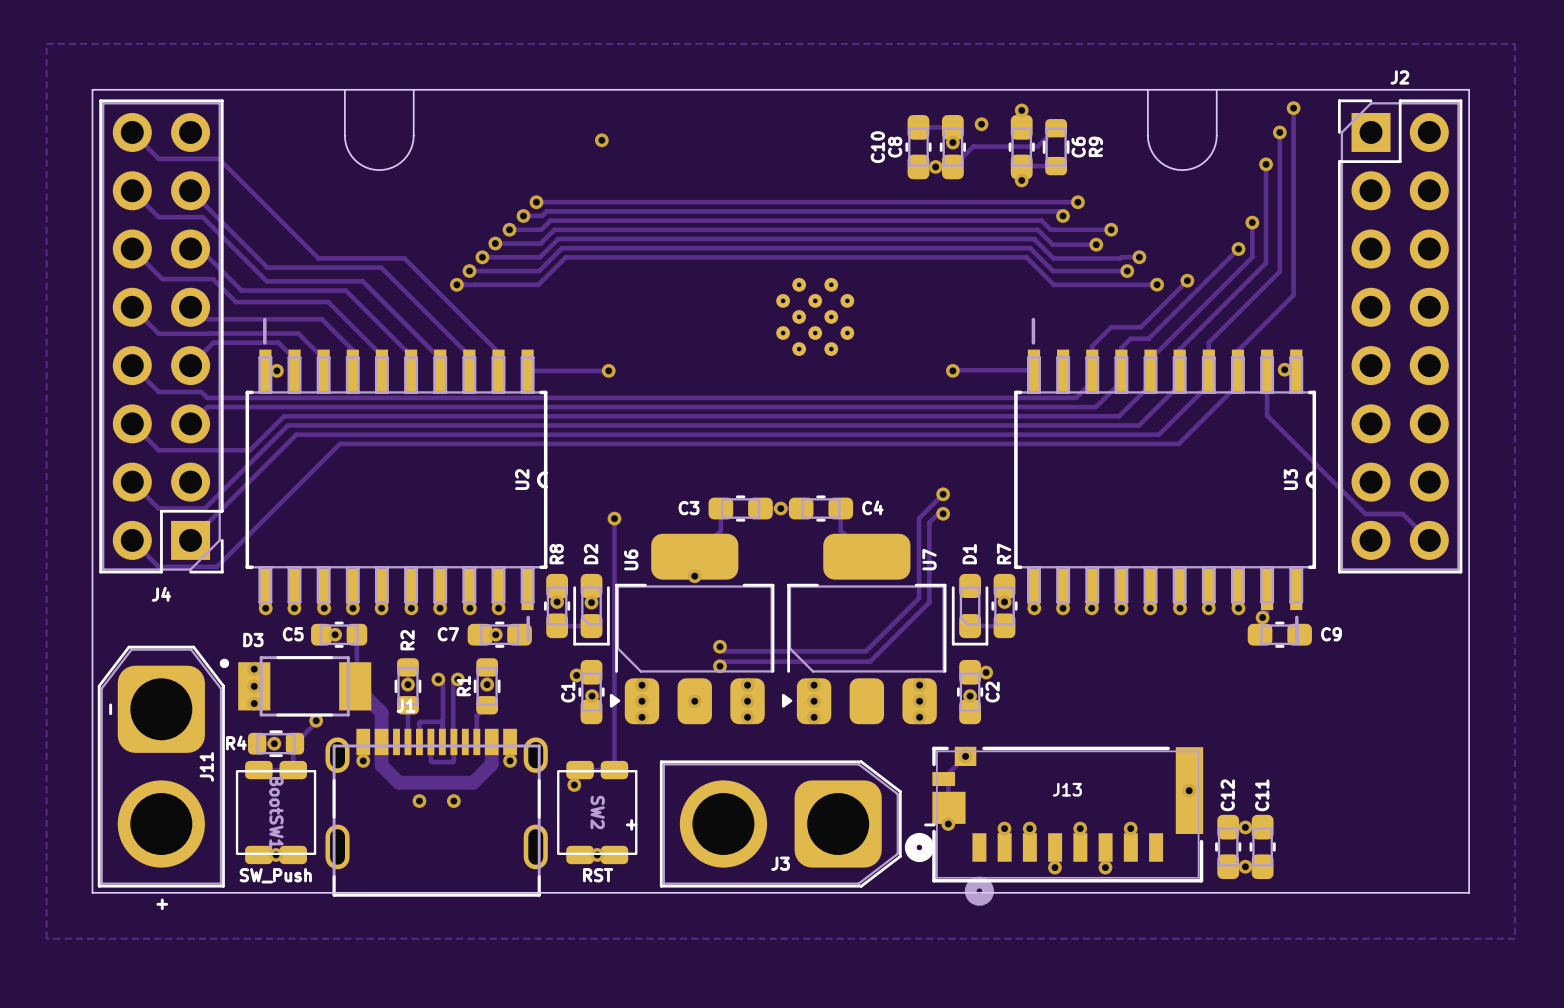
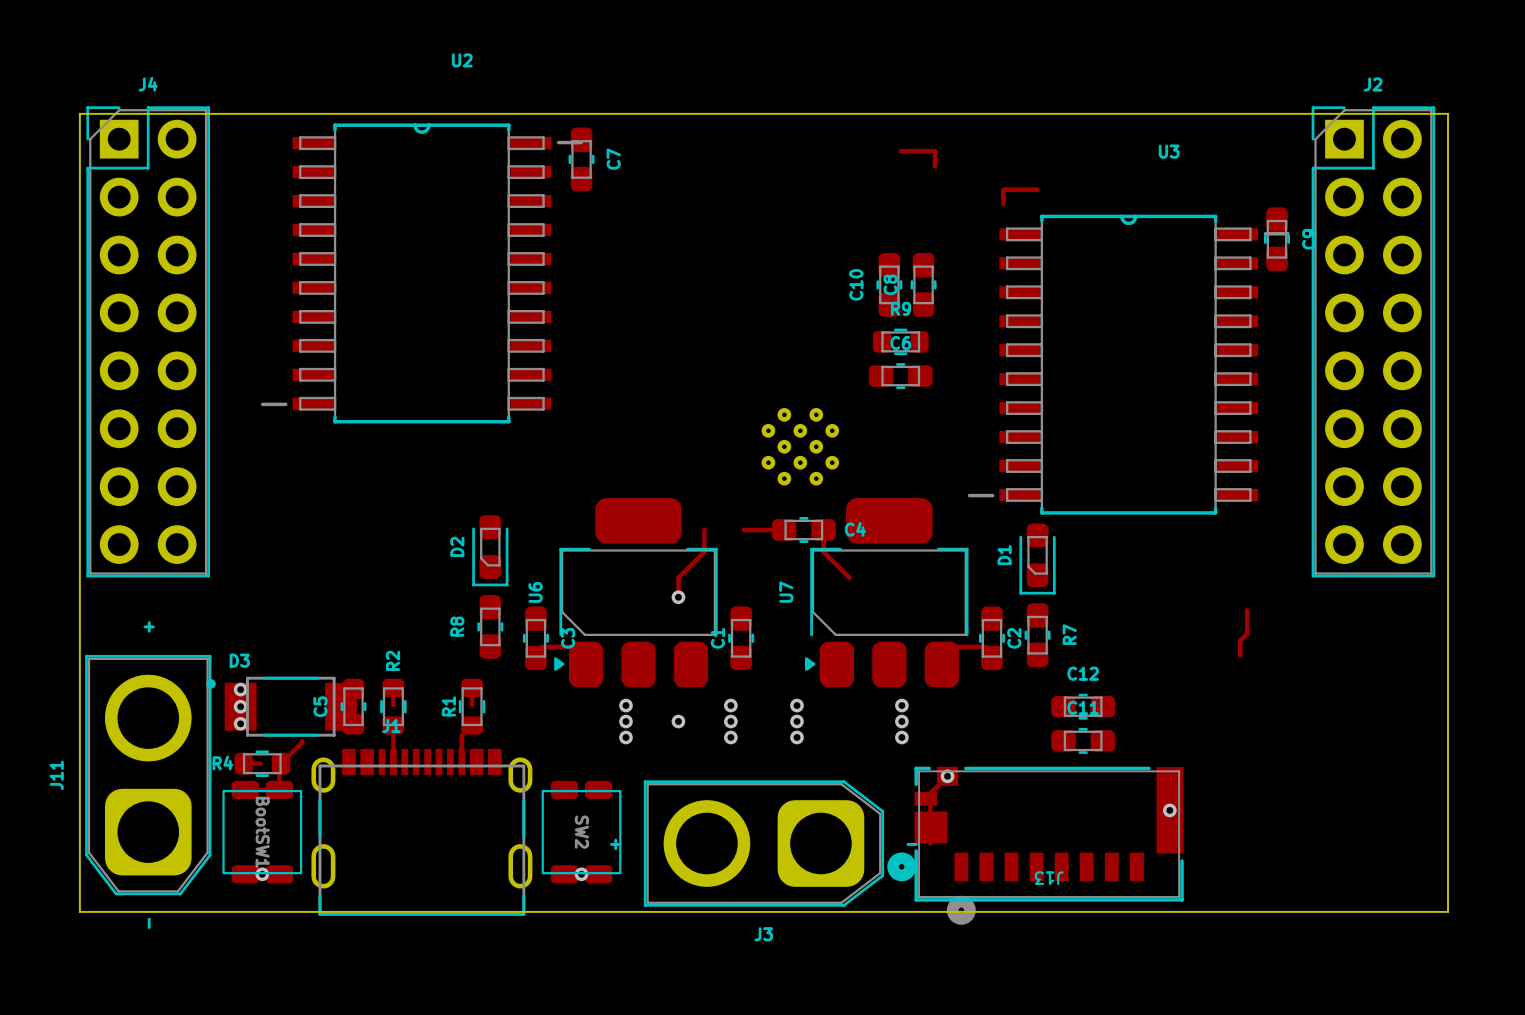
zone outline: (46, 43) (1515, 43) (1515, 938) (46, 938) (46, 43) -> none
board edge: (344, 89) (344, 135) (347, 148) (351, 156) (362, 165) (379, 170) (396, 165) (406, 156) (411, 148) (413, 135) (413, 89) -> none
board edge: (1147, 89) (1147, 135) (1150, 148) (1155, 156) (1165, 165) (1182, 170) (1199, 165) (1209, 156) (1214, 148) (1216, 135) (1216, 89) -> none
track: (1293, 108) (1293, 295) (1238, 350) (1237, 384) (1178, 443) (339, 443) (216, 566) (158, 566) (132, 540) -> none
via: (1293, 108) -> none
via: (1021, 110) -> none
via: (981, 124) -> none
track: (1056, 128) (1037, 146) (973, 146) (952, 166) (918, 166) -> none
track: (132, 132) (158, 158) (218, 158) (318, 258) (404, 258) (498, 352) (498, 370) -> none
track: (1279, 132) (1279, 271) (1208, 342) (1208, 384) (1158, 434) (296, 434) (190, 540) -> none
via: (1279, 132) -> none
via: (601, 140) -> none
via: (952, 142) -> none
R9 name position: R9 (1095, 146) -> R9 (901, 308)
C10 name position: C10 (877, 147) -> C10 (856, 284)
C8 name position: C8 (895, 147) -> C8 (890, 284)
C10 position: (918, 147) -> (889, 284)
C8 position: (952, 147) -> (923, 284)
C6 rotation: 0° (1021, 147) -> 90° clockwise (900, 376)
C6 position: (1021, 147) -> (900, 376)
R9 rotation: 0° (1056, 147) -> 90° clockwise (900, 341)
R9 position: (1056, 147) -> (900, 341)
C6 name position: C6 (1078, 147) -> C6 (900, 343)
track: (1266, 164) (1266, 263) (1179, 349) (1179, 384) (1139, 425) (287, 425) (204, 508) (158, 508) (132, 482) -> none
via: (1266, 164) -> none
via: (935, 166) -> none
via: (1021, 180) -> none
track: (132, 190) (158, 217) (202, 217) (266, 281) (362, 281) (440, 358) (440, 370) -> none
track: (190, 190) (267, 267) (381, 267) (469, 355) (469, 370) -> none
track: (536, 202) (1077, 202) -> none
via: (536, 202) -> none
via: (1077, 202) -> none
via: (523, 215) -> none
via: (1063, 215) -> none
track: (523, 216) (542, 216) (546, 211) (1058, 211) (1063, 215) -> none
track: (1252, 222) (1252, 257) (1150, 359) (1150, 384) (1119, 416) (284, 416) (250, 450) (158, 450) (132, 423) -> none
via: (1252, 222) -> none
track: (509, 229) (541, 229) (550, 220) (1041, 220) (1050, 229) (1111, 229) -> none
via: (509, 229) -> none
via: (1111, 229) -> none
track: (495, 243) (540, 243) (554, 229) (1037, 229) (1052, 244) (1096, 244) -> none
via: (495, 243) -> none
via: (1096, 244) -> none
track: (132, 249) (162, 279) (212, 279) (235, 302) (328, 302) (381, 355) (381, 370) -> none
track: (190, 249) (200, 249) (241, 290) (345, 290) (411, 355) (411, 370) -> none
track: (1238, 249) (1148, 338) (1130, 338) (1121, 348) (1121, 381) (1096, 407) (207, 407) (190, 423) -> none
via: (1238, 249) -> none
track: (482, 257) (539, 257) (558, 239) (1034, 239) (1053, 258) (1139, 257) -> none
via: (482, 257) -> none
via: (1139, 257) -> none
track: (469, 271) (539, 271) (562, 248) (1030, 248) (1053, 271) (1127, 271) -> none
via: (469, 271) -> none
via: (1127, 271) -> none
track: (1187, 280) (1140, 327) (1111, 327) (1092, 346) (1092, 381) (1076, 397) (207, 397) (201, 391) (158, 391) (132, 365) -> none
via: (1187, 280) -> none
track: (456, 284) (538, 284) (565, 257) (1026, 257) (1053, 284) (1150, 284) -> none
via: (456, 284) -> none
via: (1157, 284) -> none
track: (132, 307) (158, 333) (209, 333) -> none
track: (190, 307) (202, 319) (321, 319) (352, 350) (352, 370) -> none
part position: (815, 316) -> (800, 446)
track: (209, 333) (298, 333) (323, 358) (323, 370) -> none
J4 rotation: 0° (161, 336) -> 180° (148, 341)
J2 position: (1400, 336) -> (1373, 341)
track: (190, 365) (213, 342) (278, 342) (294, 358) (294, 370) -> none
via: (1284, 369) -> none
via: (276, 370) -> none
track: (527, 370) (608, 370) -> none
via: (608, 370) -> none
via: (952, 370) -> none
track: (1033, 370) (952, 370) -> none
track: (1267, 370) (1267, 415) (1365, 514) (1402, 514) (1429, 540) -> none
U2 rotation: 0° (396, 479) -> 90° counterclockwise (421, 273)
U2 position: (396, 479) -> (421, 273)
U2 name position: U2 (522, 479) -> U2 (462, 60)
U3 rotation: 0° (1165, 479) -> 90° counterclockwise (1128, 364)
U3 name position: U3 (1290, 479) -> U3 (1169, 151)
track: (943, 494) (919, 518) (919, 598) (865, 651) (724, 651) (720, 646) -> none
via: (943, 494) -> none
C3 name position: C3 (689, 508) -> C3 (568, 638)
C3 rotation: 0° (740, 508) -> 90° clockwise (535, 638)
C3 position: (740, 508) -> (535, 638)
via: (780, 508) -> none
track: (943, 513) (938, 513) (929, 522) (929, 602) (870, 661) (724, 661) (720, 666) -> none
via: (943, 513) -> none
track: (614, 518) (614, 770) (580, 770) (574, 775) (574, 784) -> none
via: (614, 518) -> none
R7 name position: R7 (1004, 553) -> R7 (1069, 634)
R8 name position: R8 (556, 554) -> R8 (457, 626)
D2 name position: D2 (591, 554) -> D2 (457, 546)
D1 name position: D1 (969, 554) -> D1 (1004, 555)
U6 name position: U6 (631, 559) -> U6 (535, 592)
U7 name position: U7 (929, 559) -> U7 (786, 592)
via: (557, 602) -> none
via: (591, 602) -> none
via: (1004, 602) -> none
R8 position: (557, 606) -> (490, 626)
R7 position: (1004, 606) -> (1037, 635)
via: (265, 608) -> none
via: (294, 608) -> none
via: (324, 608) -> none
via: (352, 608) -> none
via: (381, 608) -> none
via: (411, 608) -> none
via: (440, 608) -> none
via: (469, 608) -> none
via: (498, 608) -> none
via: (1034, 608) -> none
via: (1063, 608) -> none
via: (1091, 608) -> none
via: (1121, 608) -> none
via: (1150, 608) -> none
via: (1180, 608) -> none
via: (1208, 608) -> none
via: (1238, 608) -> none
D2 position: (591, 609) -> (490, 550)
D1 position: (970, 609) -> (1037, 559)
via: (1262, 617) -> none
U6 position: (692, 628) -> (635, 592)
U7 position: (864, 628) -> (886, 592)
via: (335, 634) -> none
C5 rotation: 0° (339, 634) -> 90° clockwise (353, 706)
C5 position: (339, 634) -> (353, 706)
track: (356, 634) (356, 684) (355, 686) (381, 712) (381, 765) (398, 782) (473, 782) (491, 764) (491, 741) -> none
C7 name position: C7 (448, 634) -> C7 (613, 159)
via: (495, 634) -> none
C7 rotation: 0° (499, 634) -> 90° clockwise (581, 159)
C7 position: (499, 634) -> (581, 159)
C9 rotation: 0° (1279, 634) -> 90° clockwise (1276, 239)
C9 position: (1279, 634) -> (1276, 239)
J11 footprint: [97, 645, 225, 888] -> [85, 654, 212, 896]
via: (720, 646) -> none
via: (720, 666) -> none
via: (986, 672) -> none
via: (576, 675) -> none
track: (438, 679) (442, 684) (442, 741) (441, 721) (420, 721) (419, 741) -> none
via: (438, 679) -> none
track: (457, 679) (453, 684) (453, 760) (432, 762) (430, 741) -> none
via: (457, 679) -> none
via: (407, 684) -> none
via: (487, 684) -> none
C1 position: (591, 692) -> (741, 638)
C2 position: (970, 692) -> (991, 638)
via: (592, 696) -> none
via: (970, 696) -> none
via: (316, 720) -> none
via: (274, 743) -> none
via: (363, 760) -> none
via: (510, 760) -> none
J11 name position: J11 (206, 766) -> J11 (56, 775)
via: (574, 784) -> none
J13 name rotation: 0° (1067, 789) -> 180° (1049, 878)
J13 name position: J13 (1067, 789) -> J13 (1049, 878)
via: (419, 801) -> none
via: (453, 801) -> none
via: (948, 823) -> none
via: (1245, 827) -> none
via: (1004, 828) -> none
via: (1029, 828) -> none
via: (1080, 828) -> none
via: (1130, 828) -> none
C12 rotation: 0° (1228, 846) -> 90° clockwise (1083, 706)
C12 position: (1228, 846) -> (1083, 706)
C11 rotation: 0° (1262, 846) -> 90° clockwise (1083, 740)
C11 position: (1262, 846) -> (1083, 740)
J3 name position: J3 (780, 863) -> J3 (763, 934)
via: (1245, 866) -> none
via: (1054, 867) -> none
via: (1105, 867) -> none
BootSW1 value: SW_Push (275, 875) -> none
SW2 value: RST (598, 875) -> none

